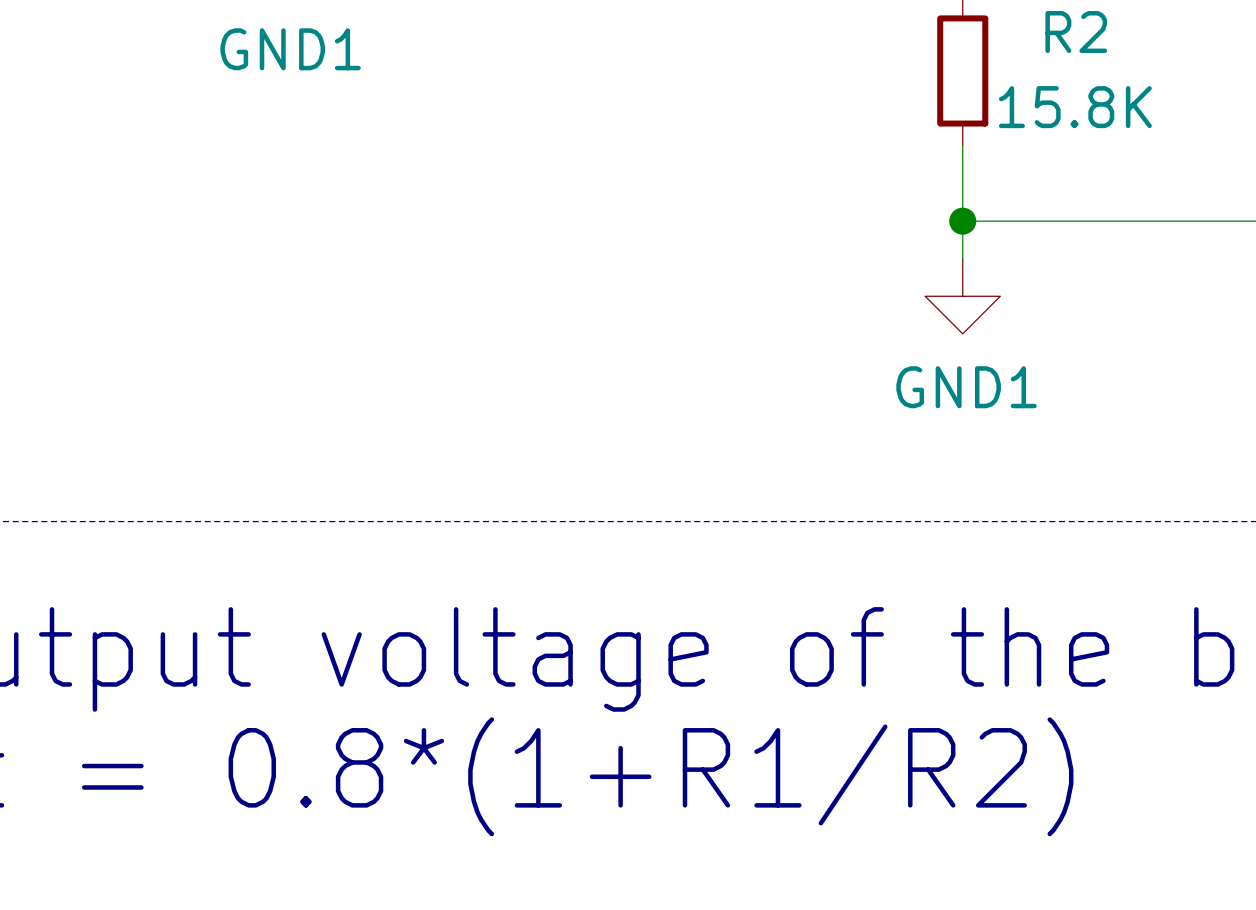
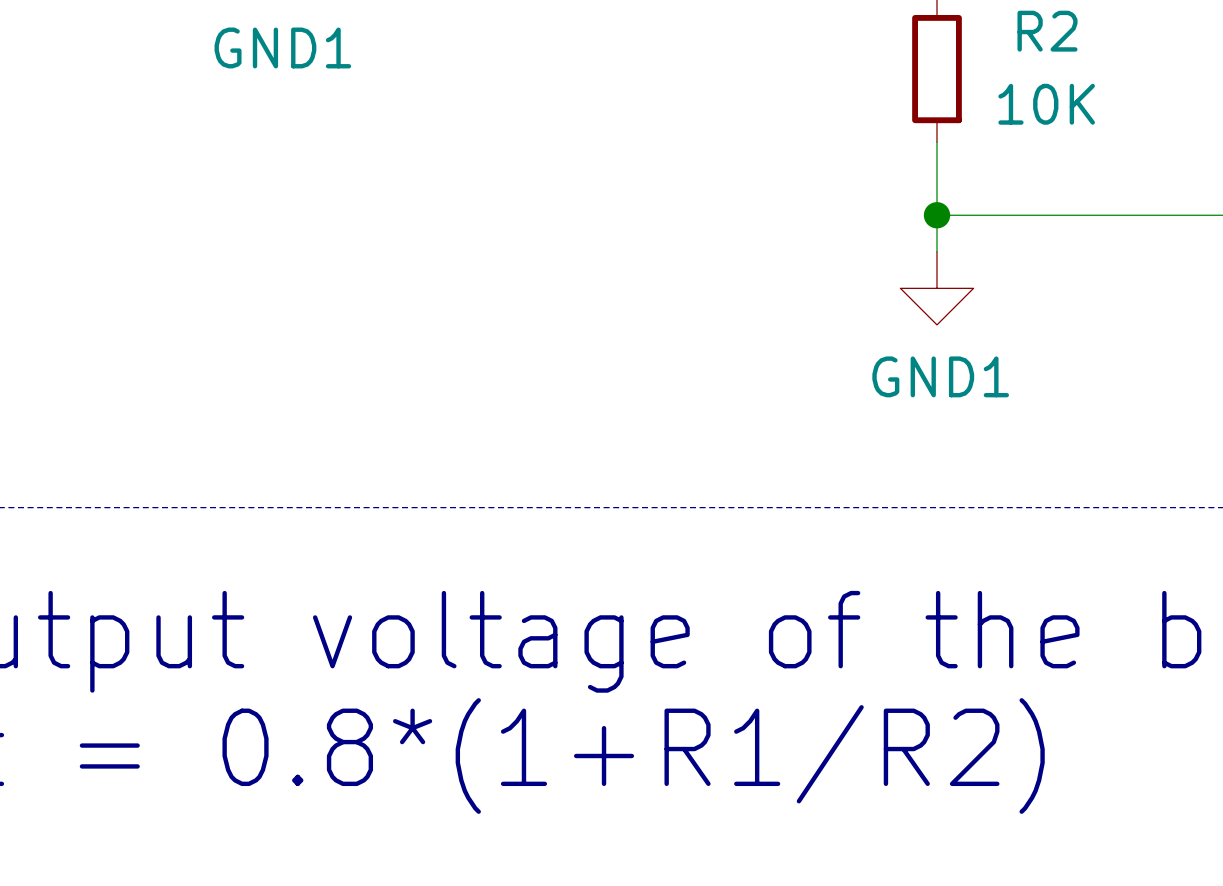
R2 value: 15.8K (1075, 107) -> 10K (1046, 104)

